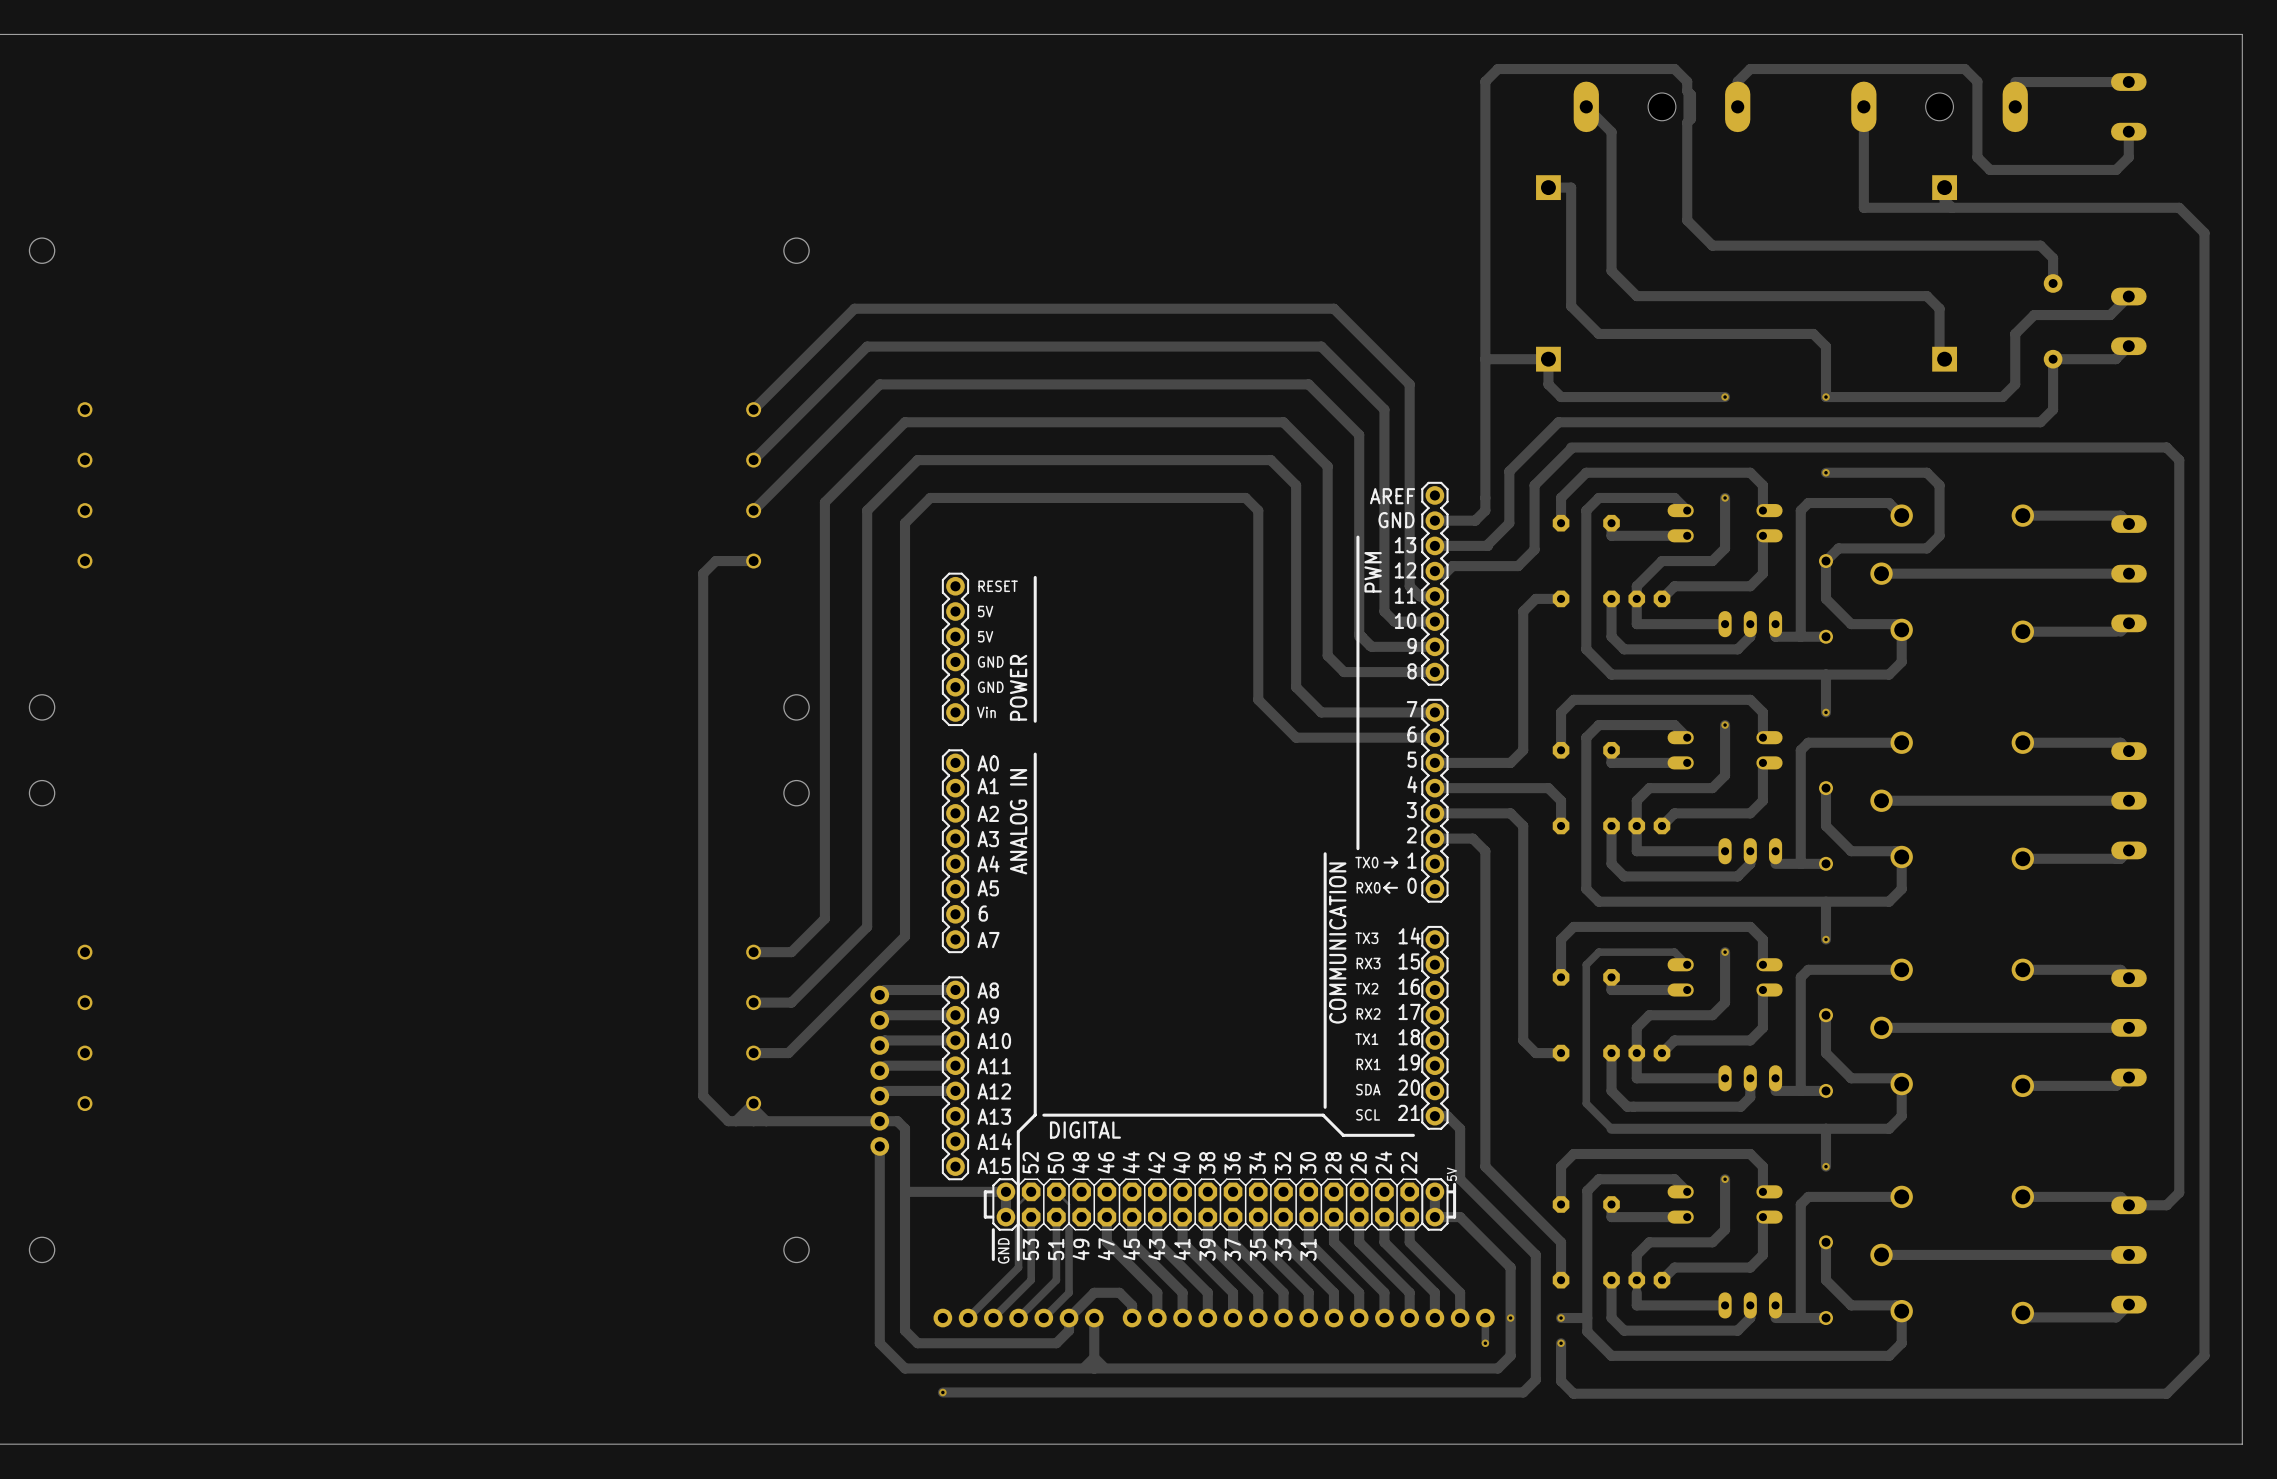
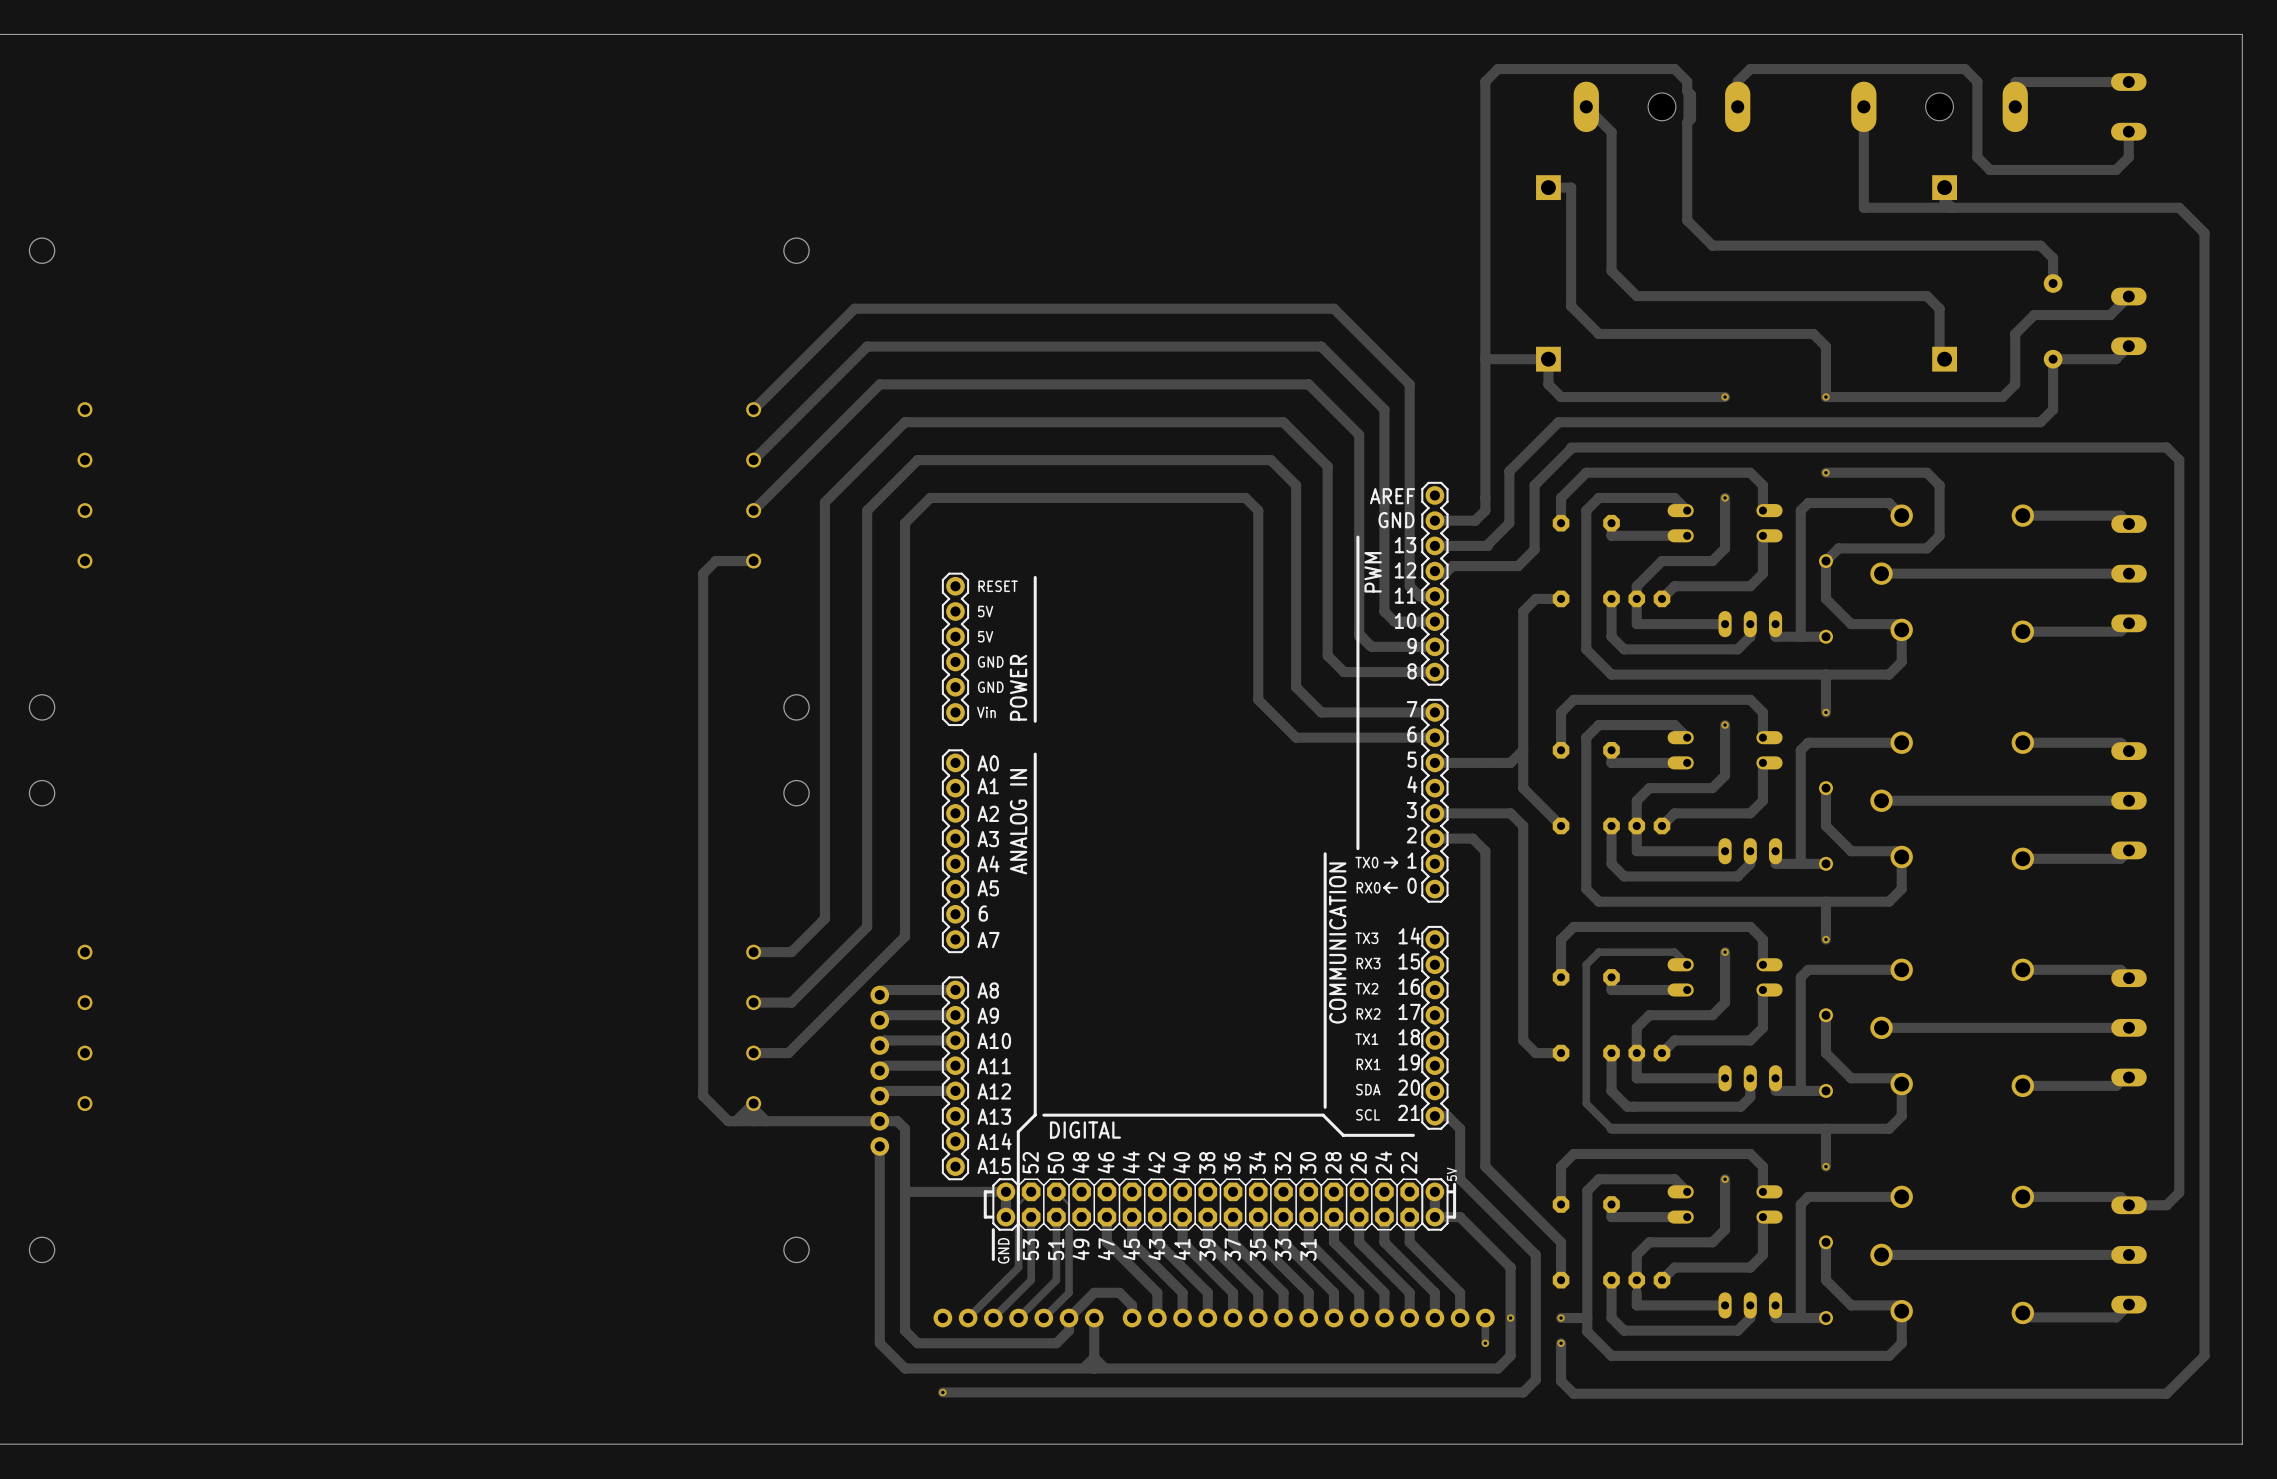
track: (1434, 788) (1548, 788) (1561, 800) (1561, 825) -> (1523, 750) (1523, 788) (1561, 825)

